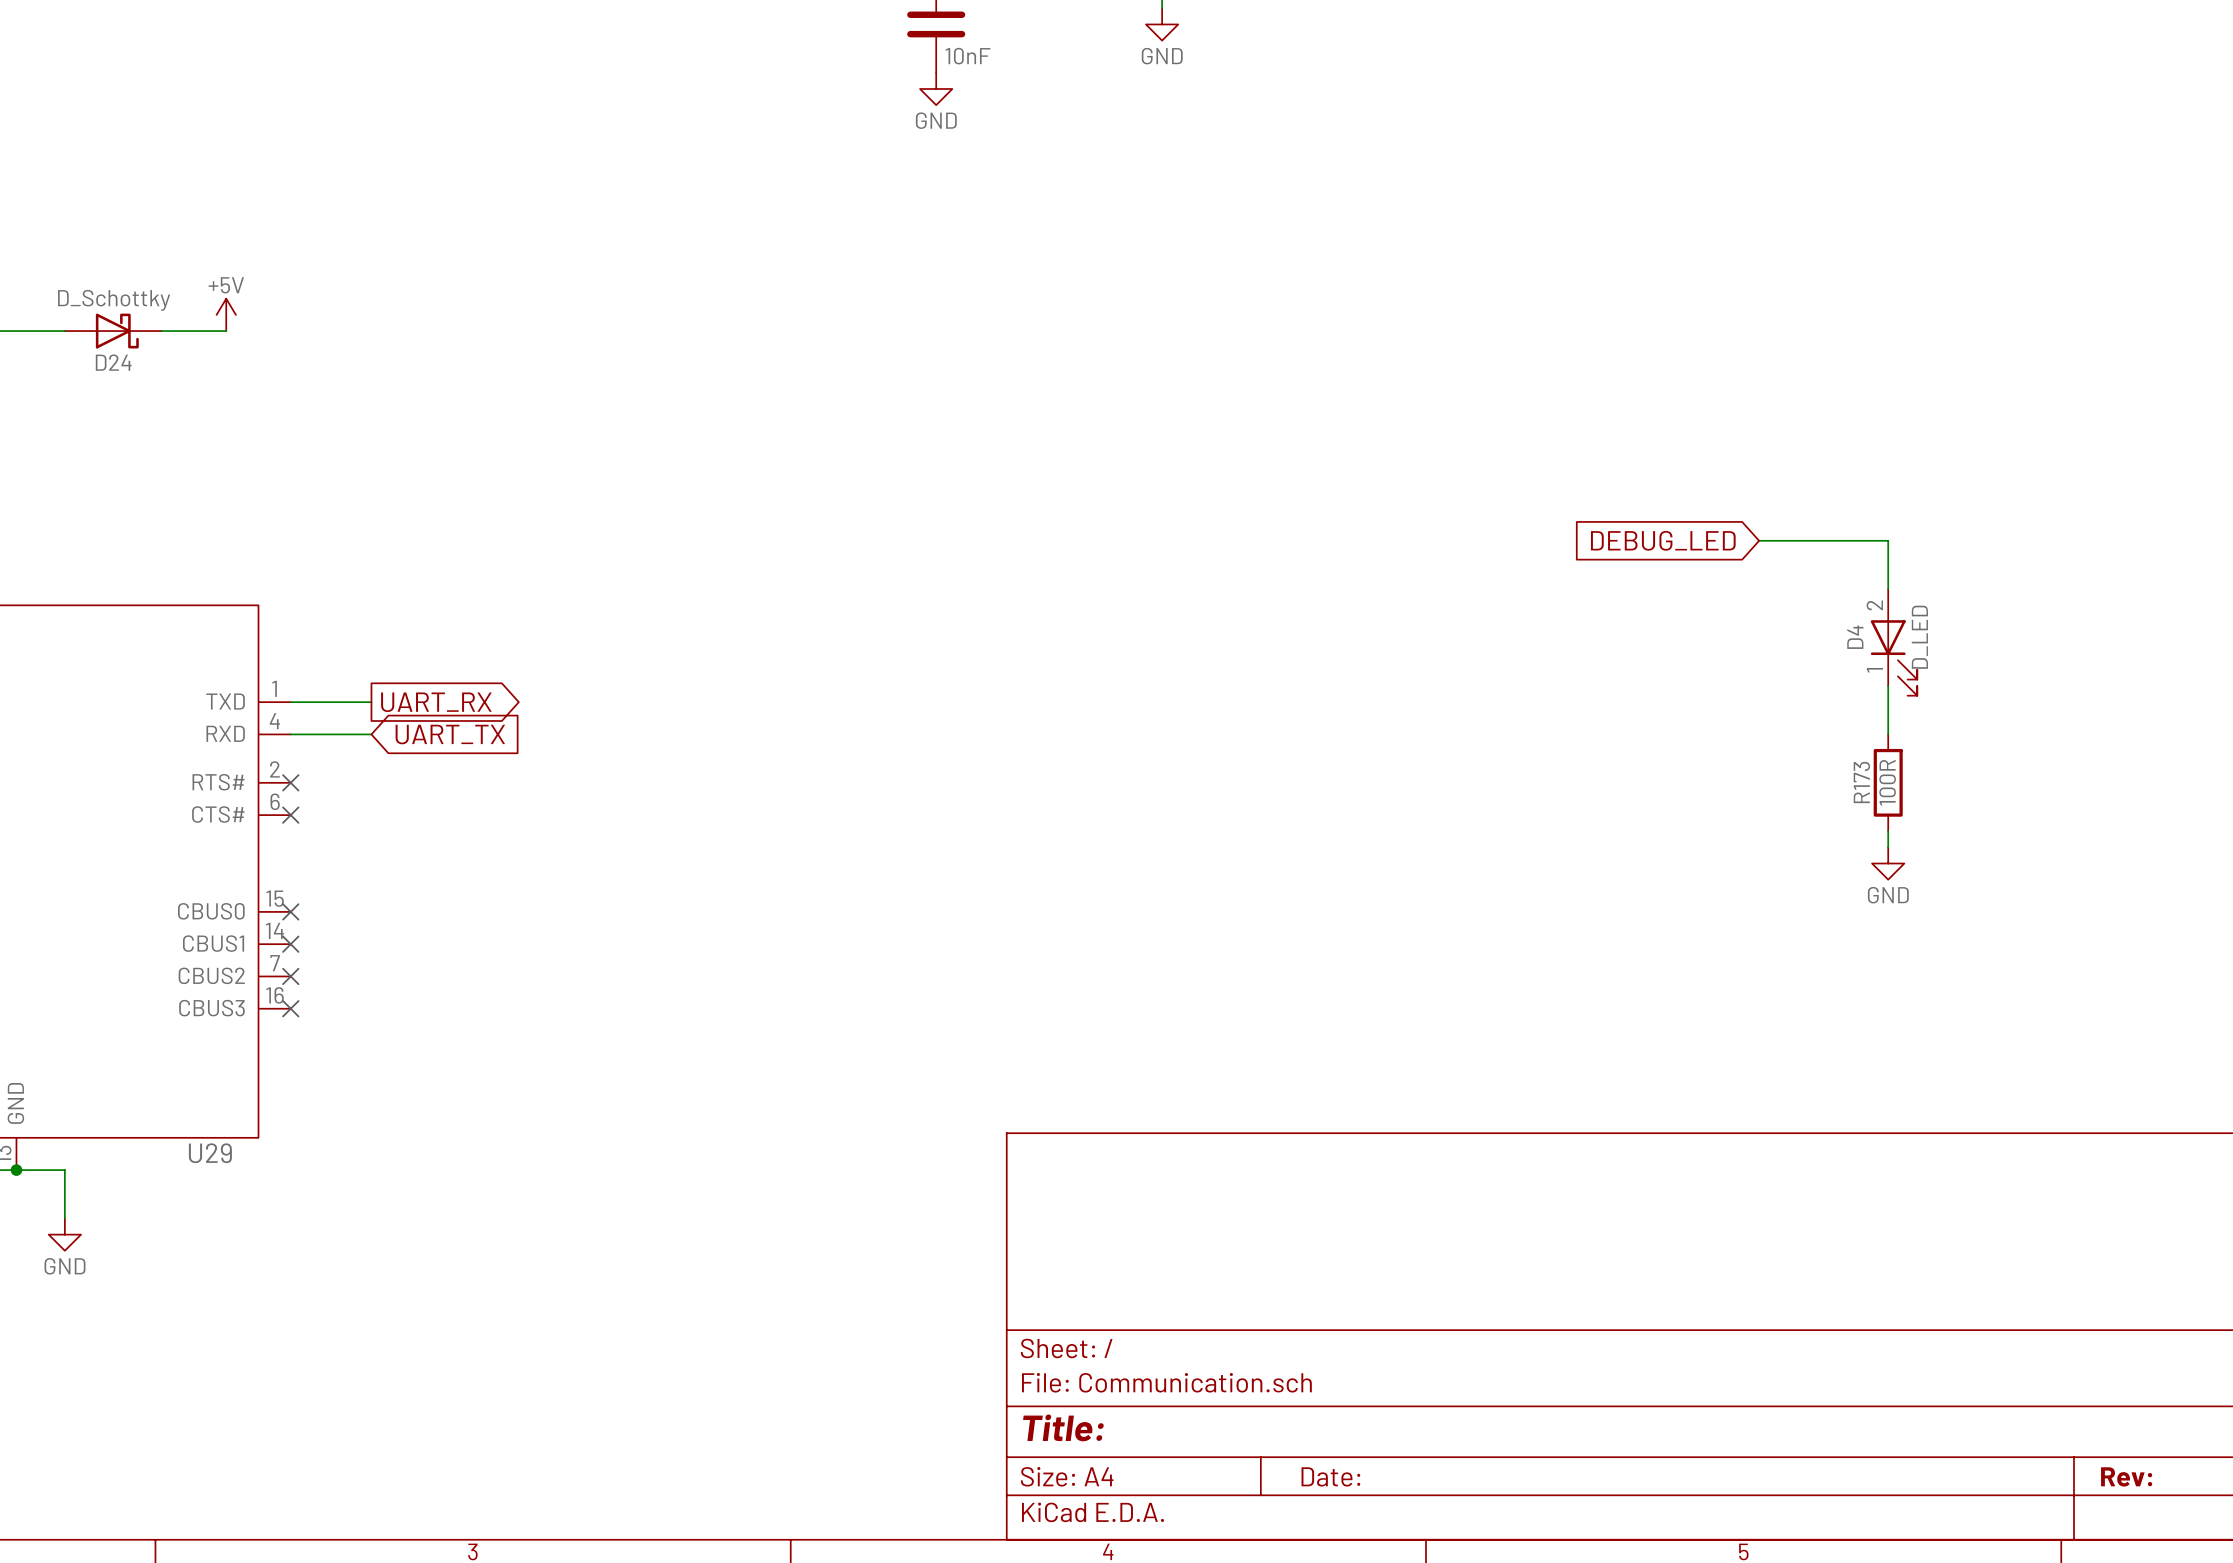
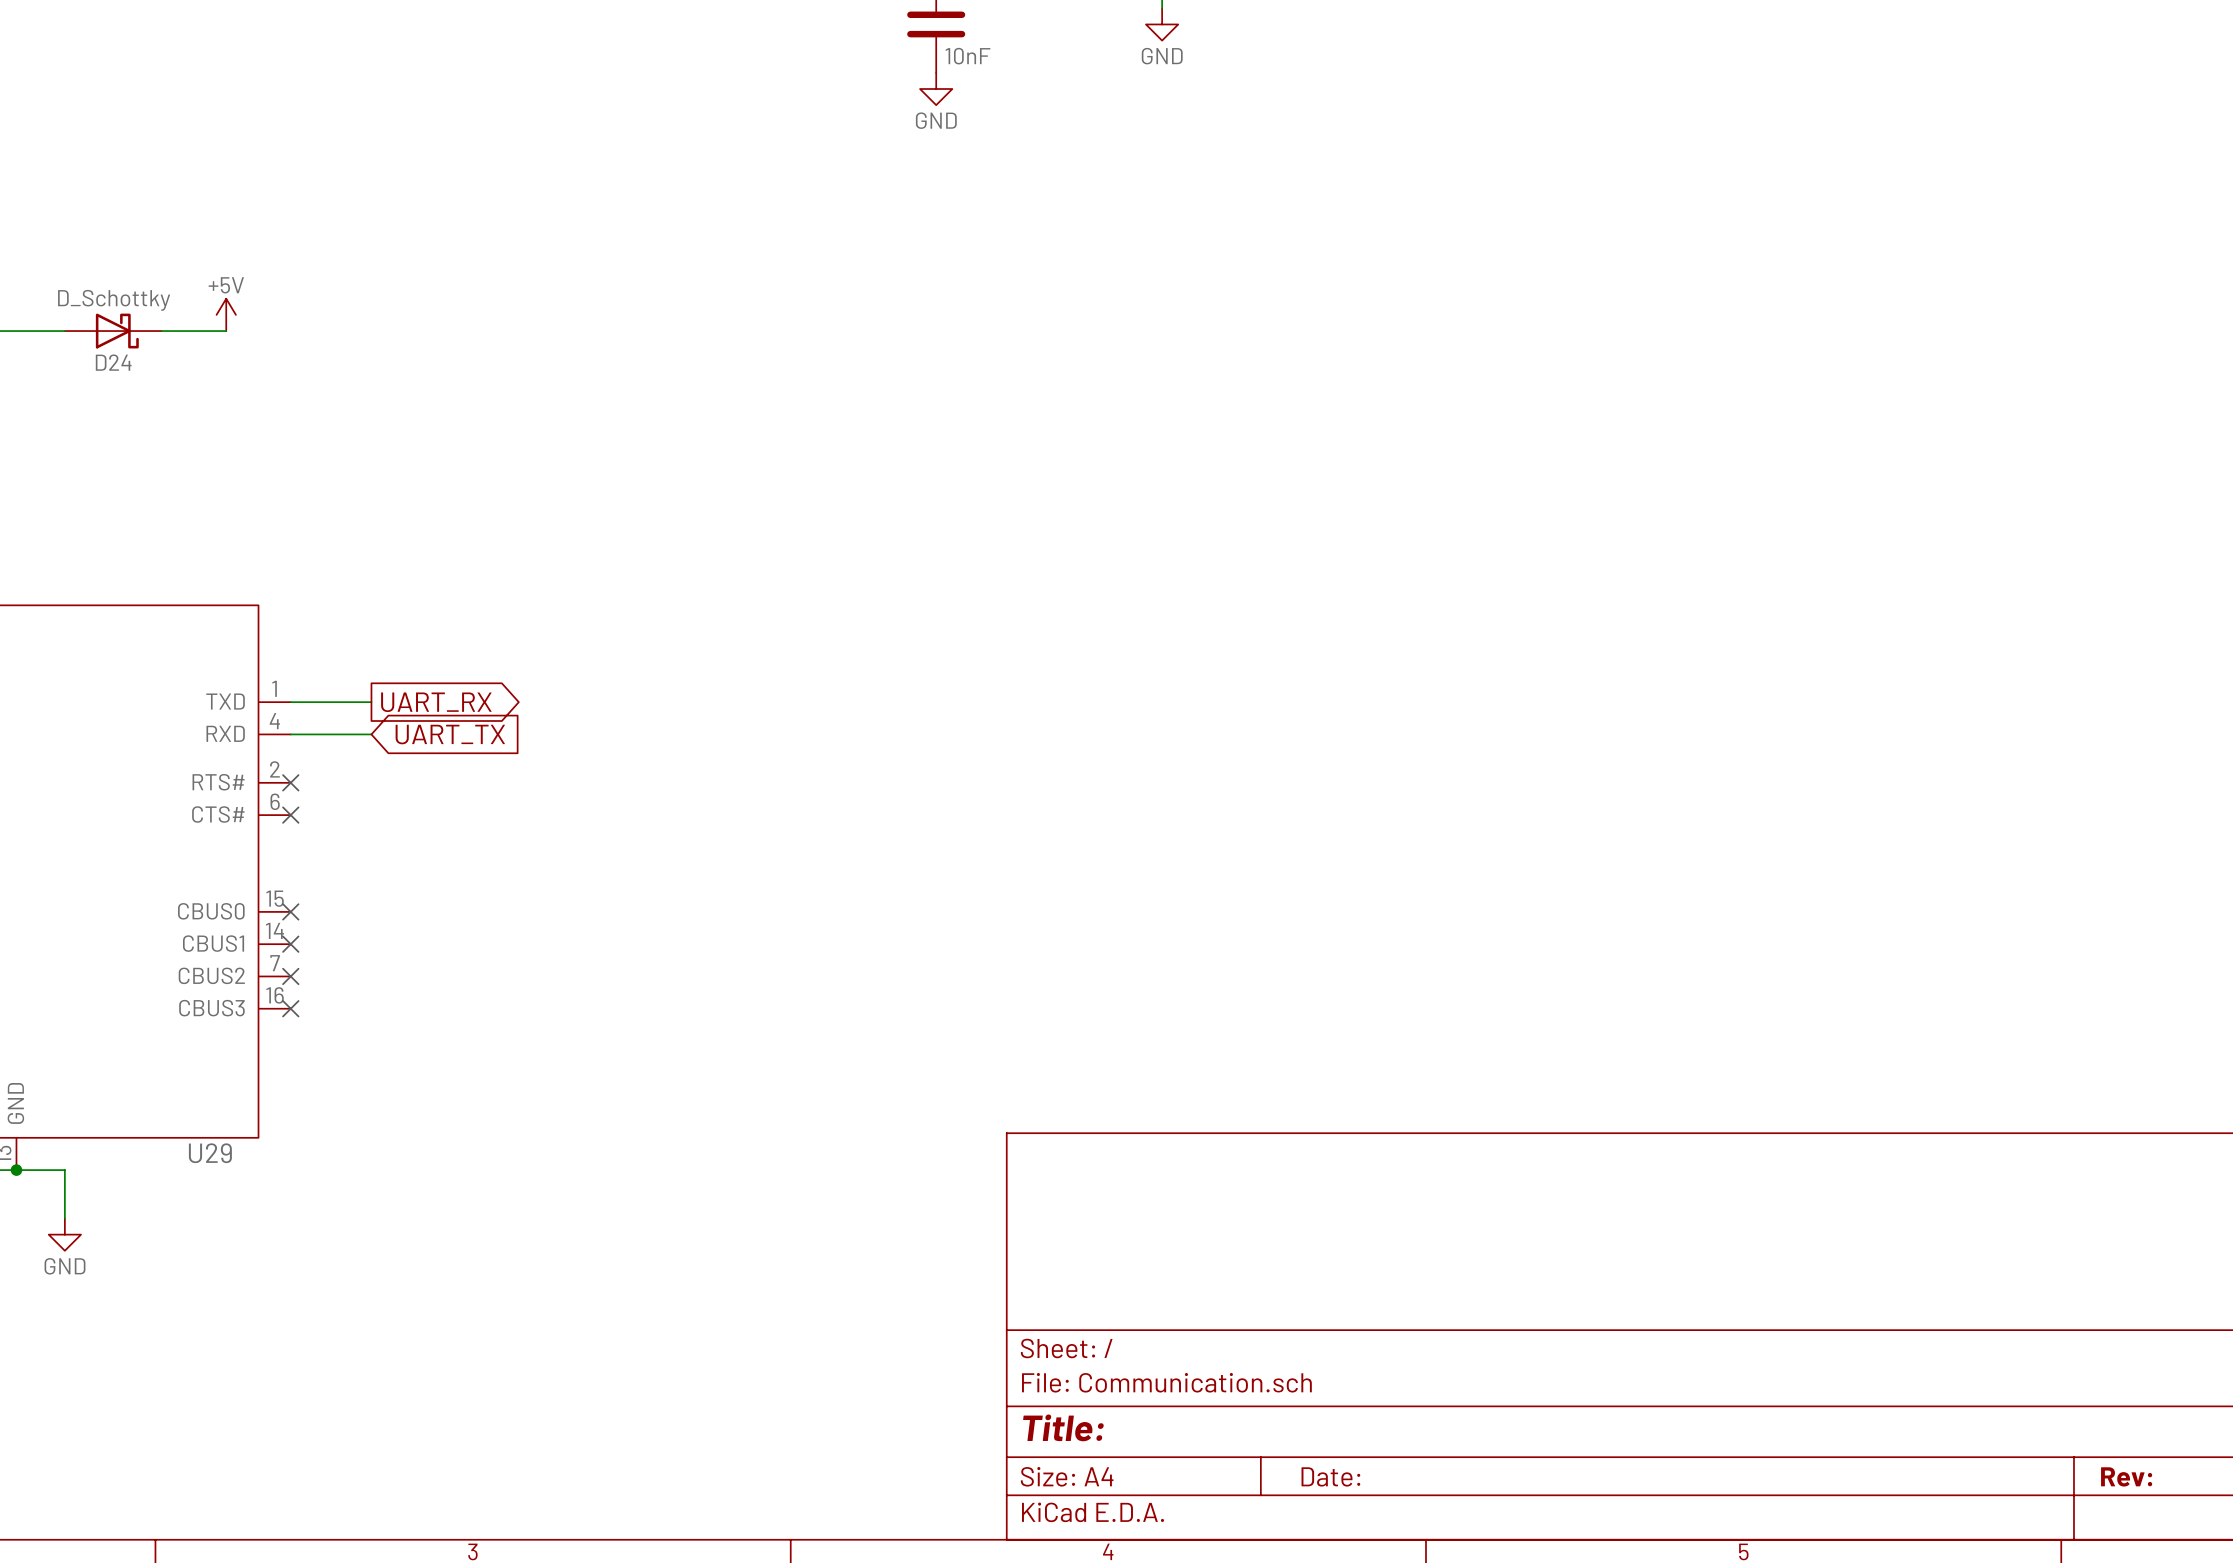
global label: DEBUG_LED (1663, 540) -> none
wire: (1759, 540) (1888, 540) (1888, 589) -> none
D4: D_LED (1894, 642) -> none
wire: (1888, 686) (1888, 734) -> none
R173: 100R (1888, 782) -> none
wire: (1888, 831) (1888, 847) -> none
power symbol: GND (1888, 863) -> none

